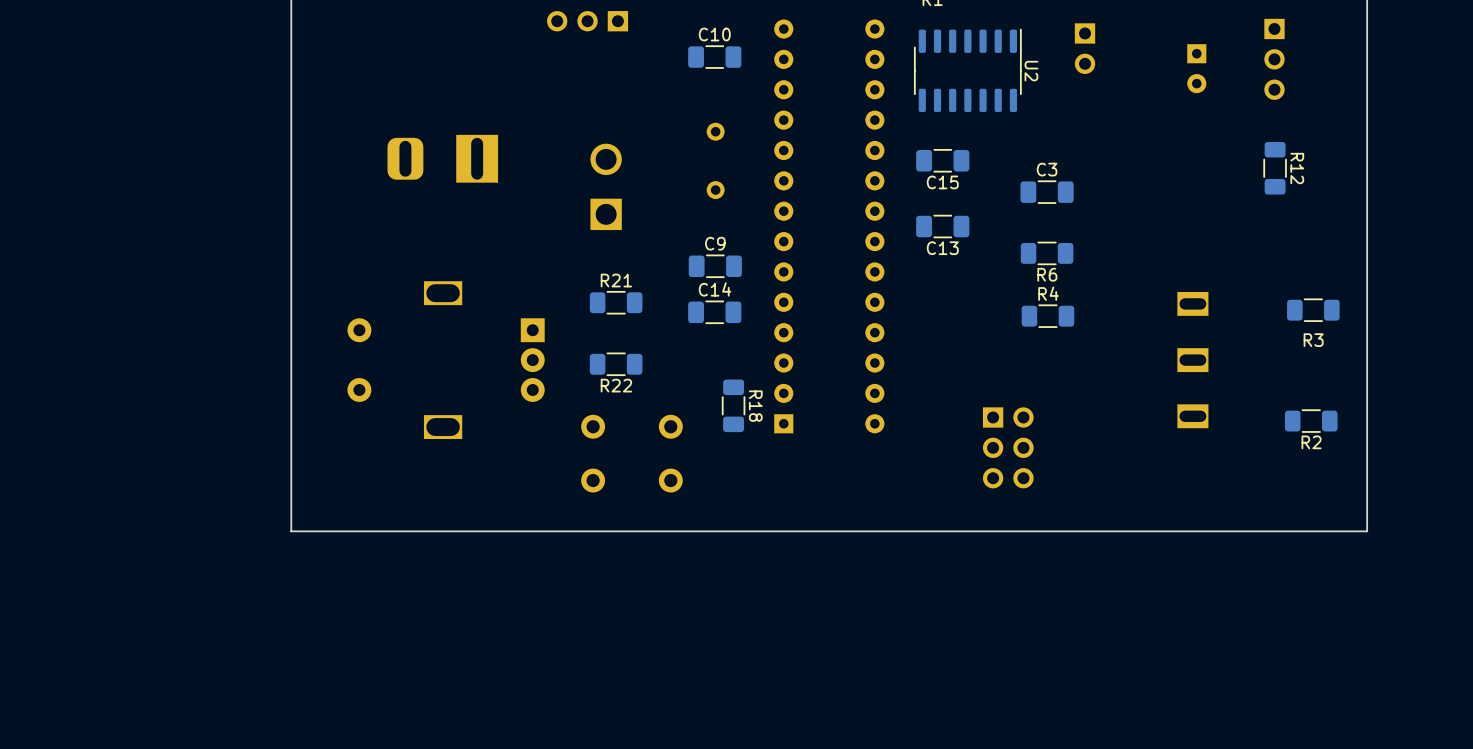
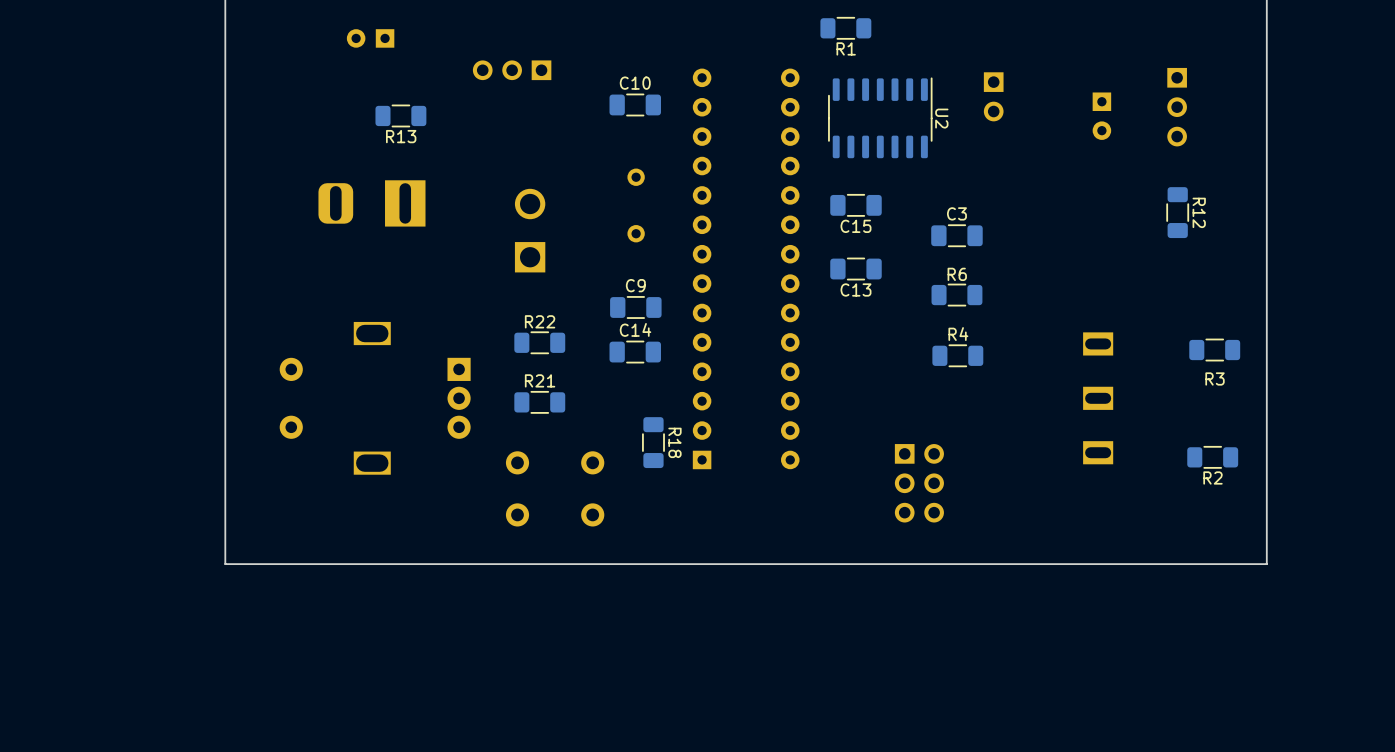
R13: none -> (400, 115)
R6 name position: R6 (1047, 274) -> R6 (957, 274)
R21 name: R21 (616, 280) -> R22 (540, 321)
R22 name: R22 (616, 385) -> R21 (540, 380)

